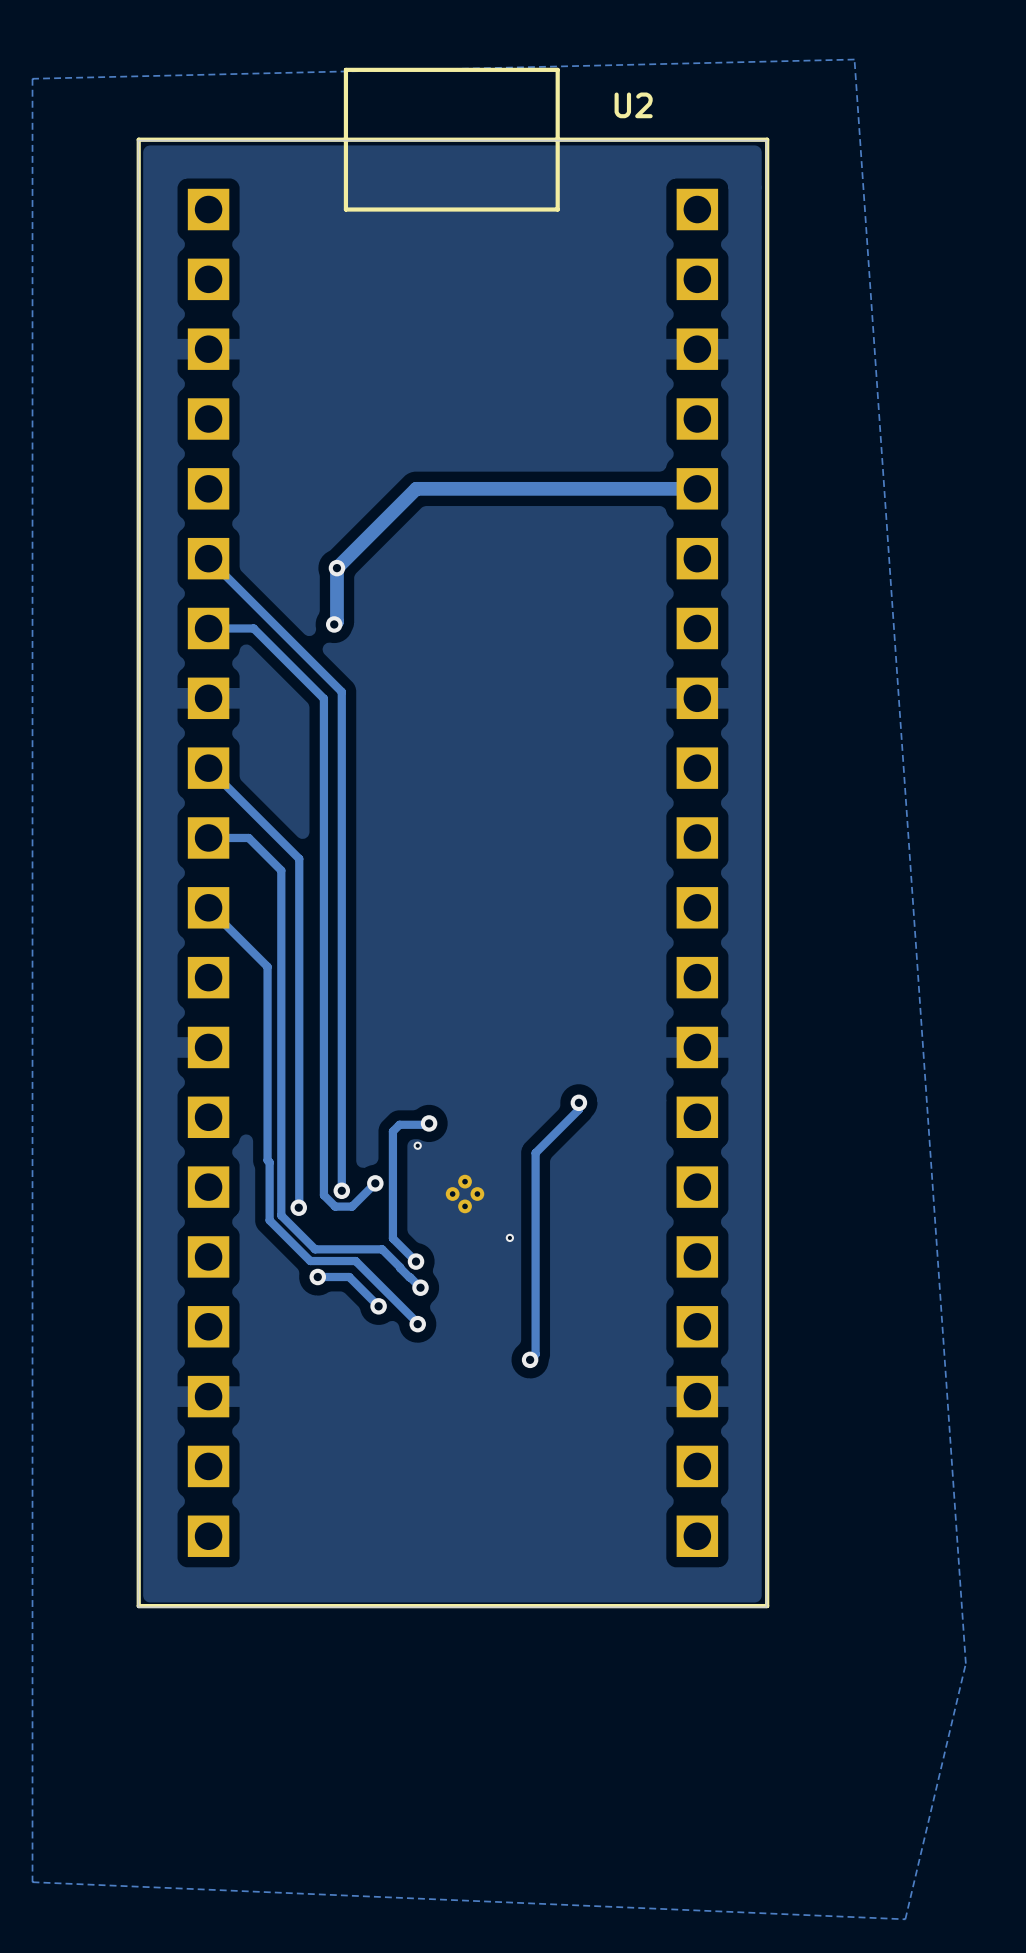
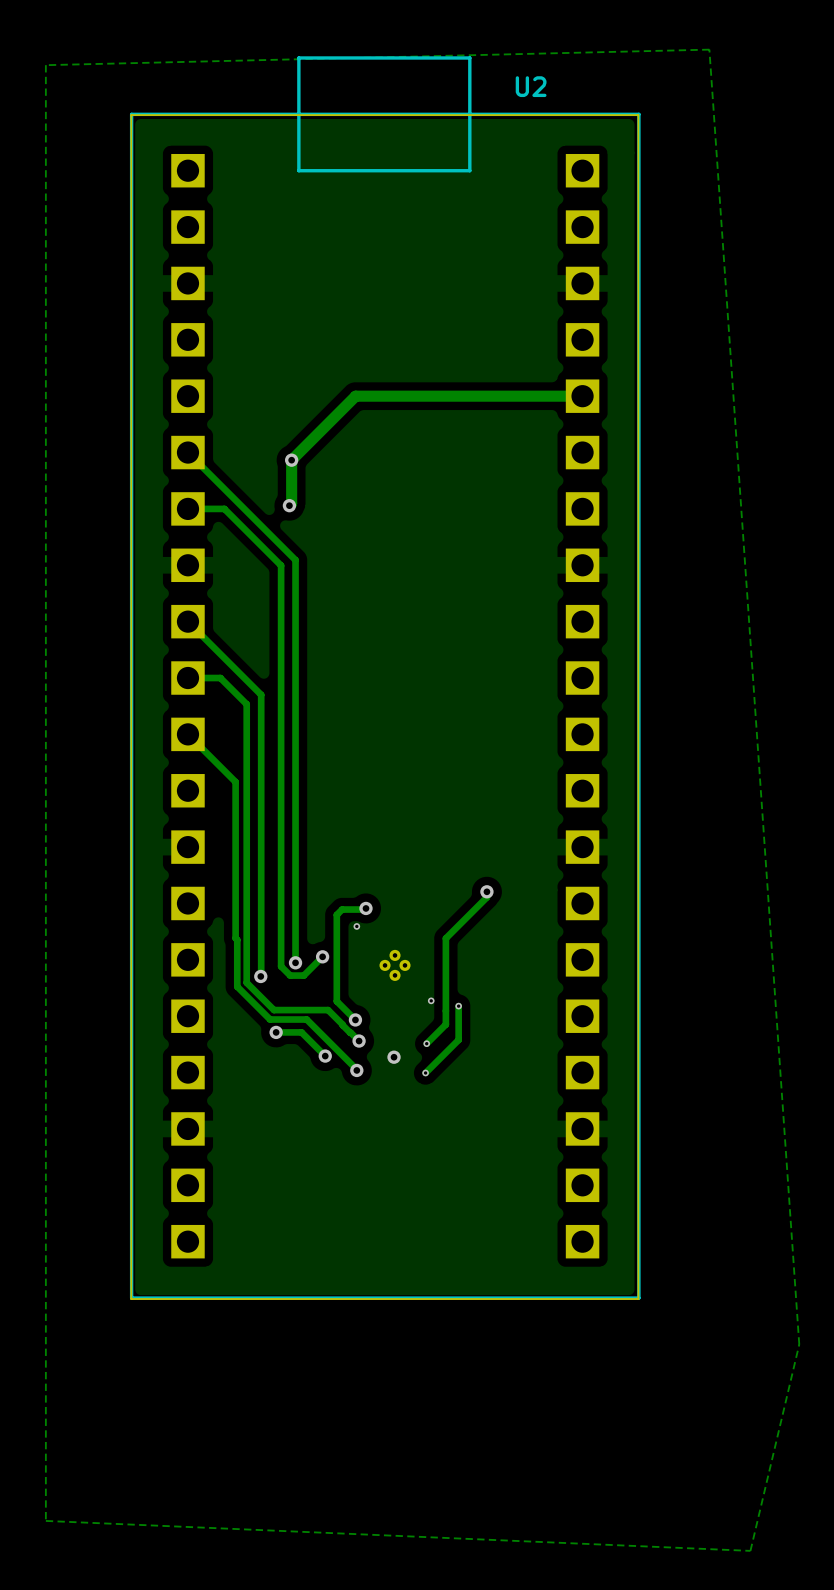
track: (535, 1152) (535, 1354) (530, 1359) -> (451, 932) (445, 938) (445, 1024) (426, 1043)
track: none -> (458, 1006) (458, 1039) (425, 1072)
via: none -> (458, 1006)
via: none -> (426, 1043)
via: none -> (425, 1072)
via position: (530, 1359) -> (394, 1057)

